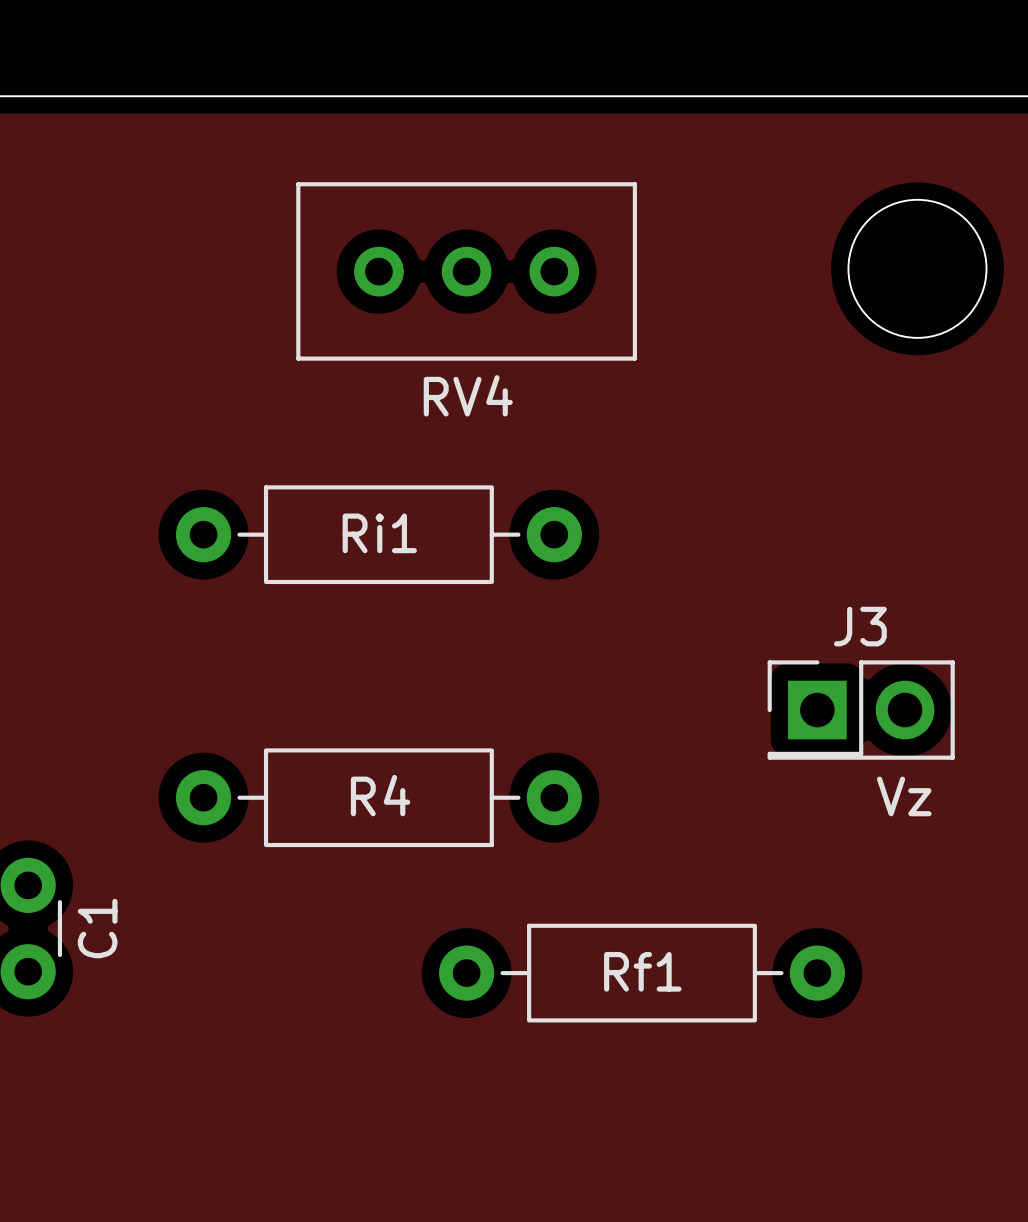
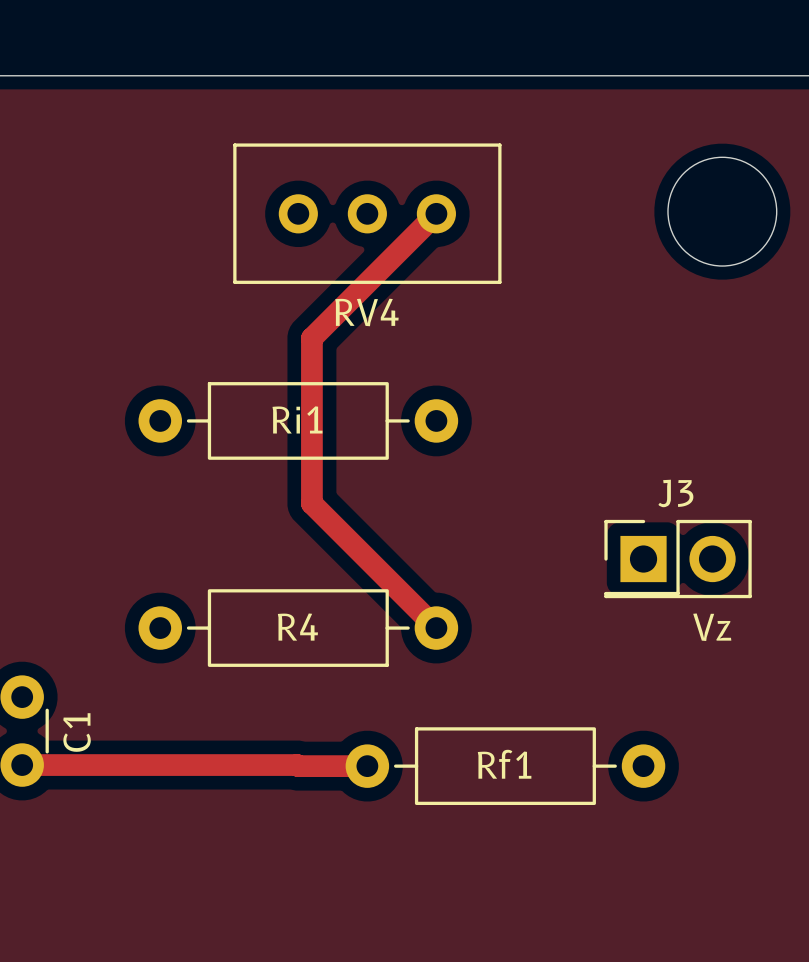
track: none -> (436, 213) (311, 338) (311, 503) (436, 628)
track: none -> (22, 765) (367, 766)

